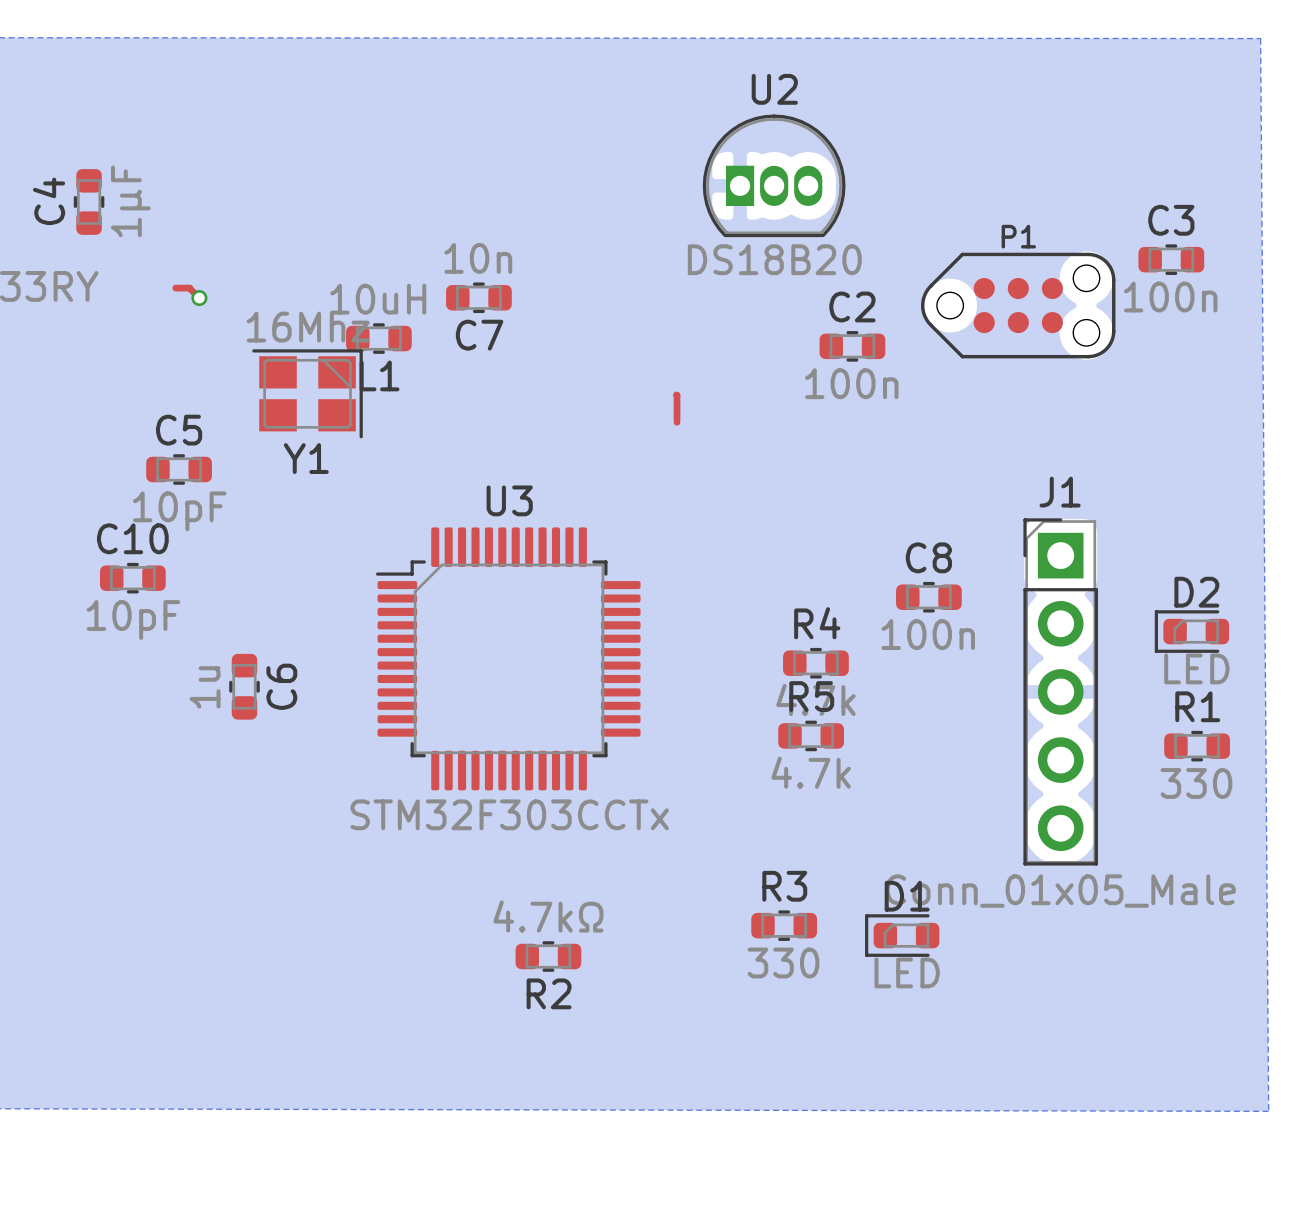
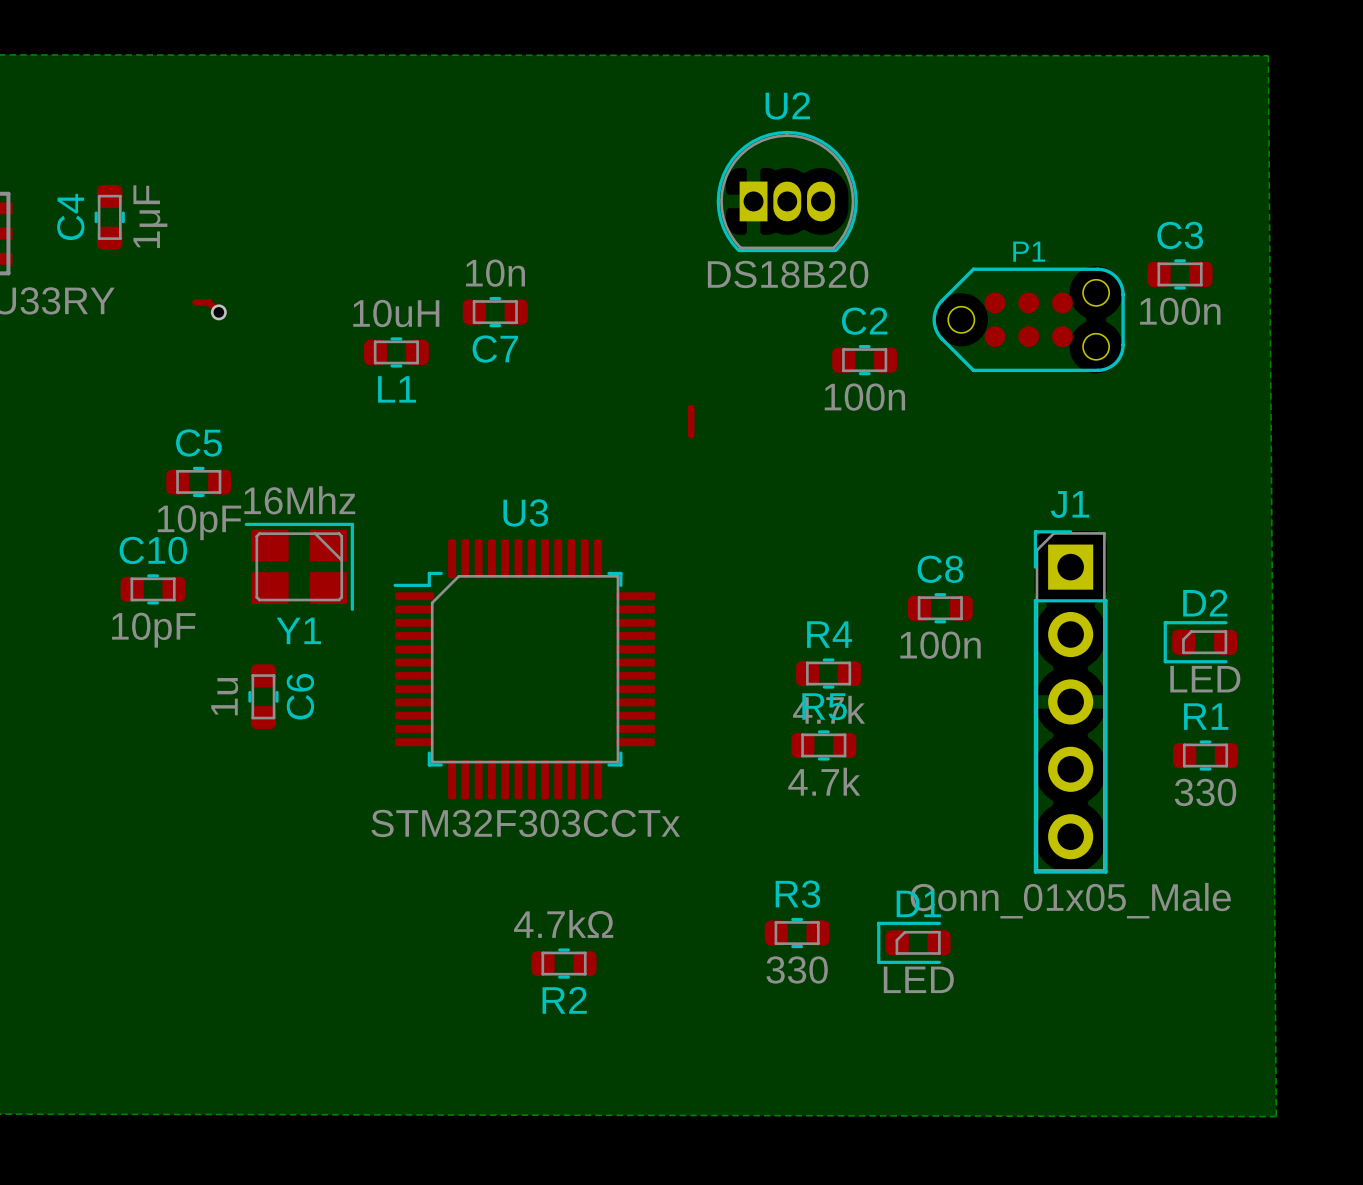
Y1 position: (307, 393) -> (299, 566)

